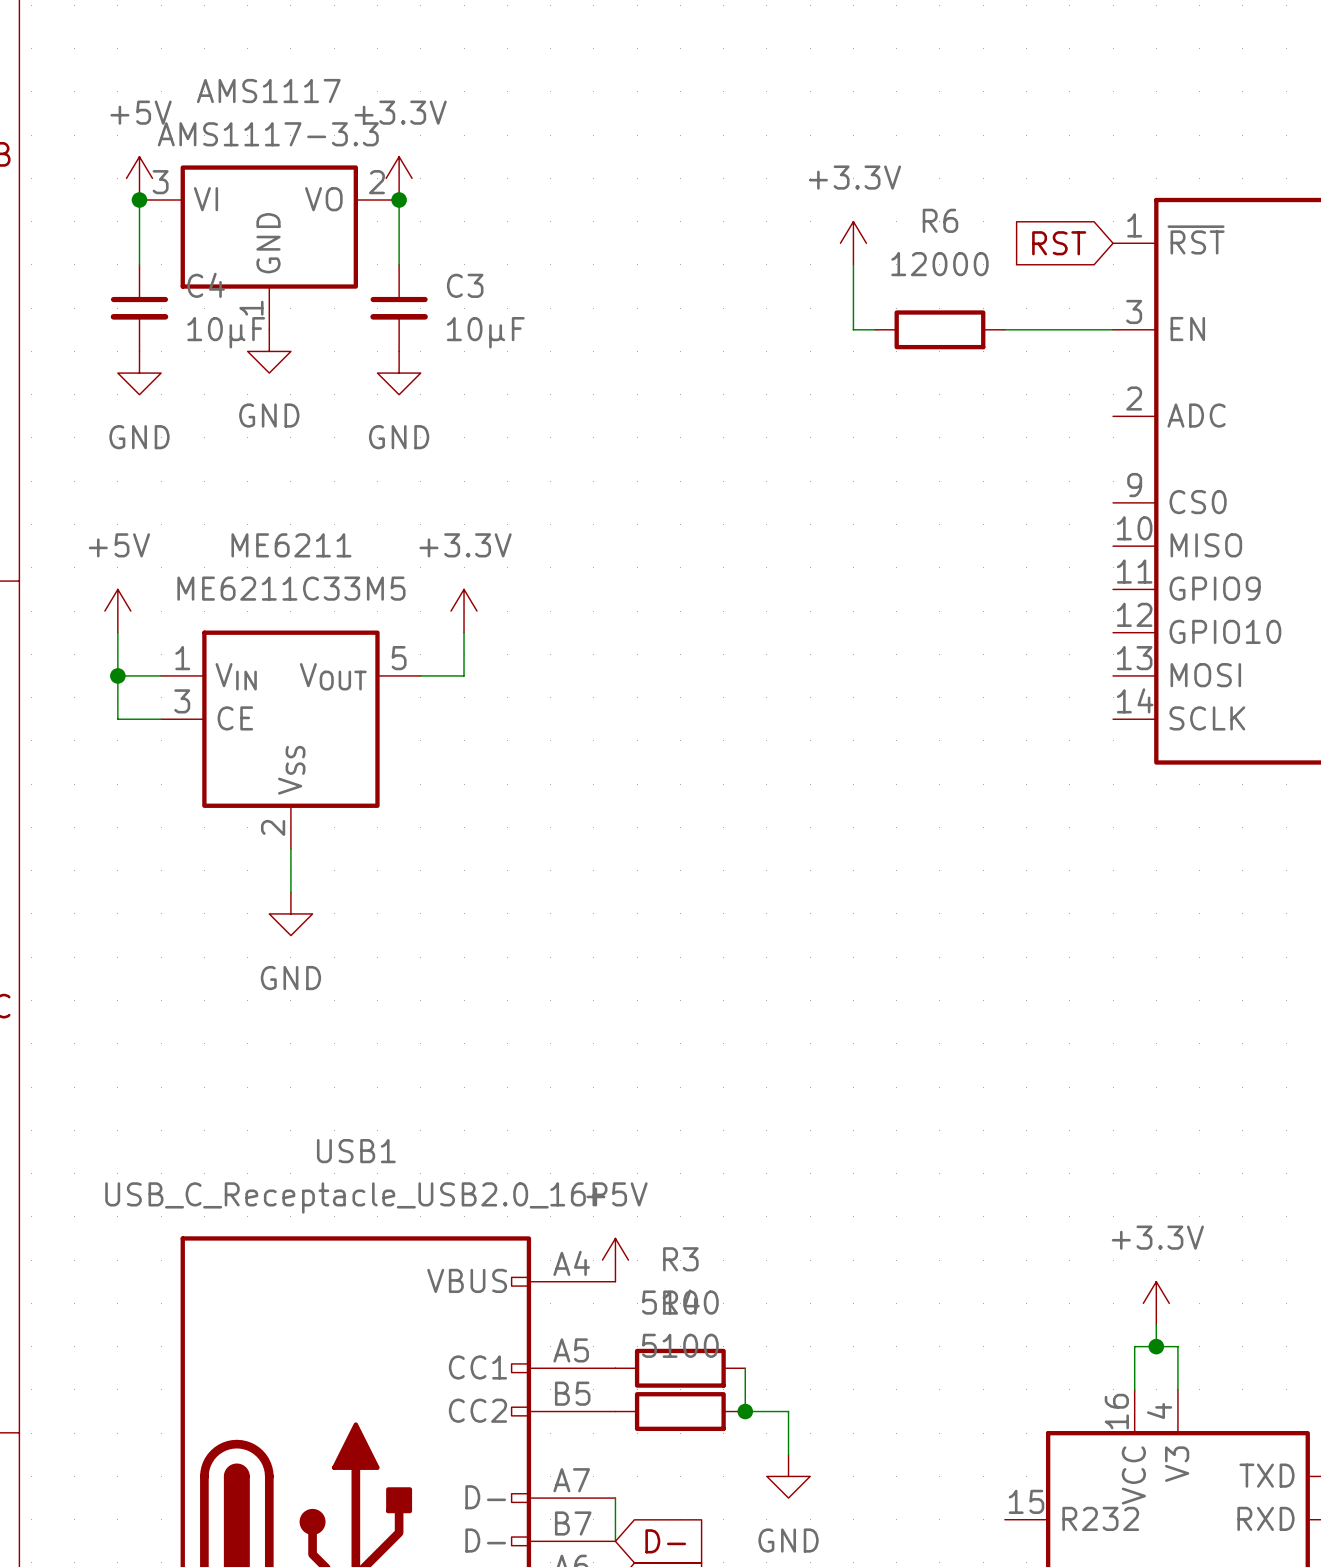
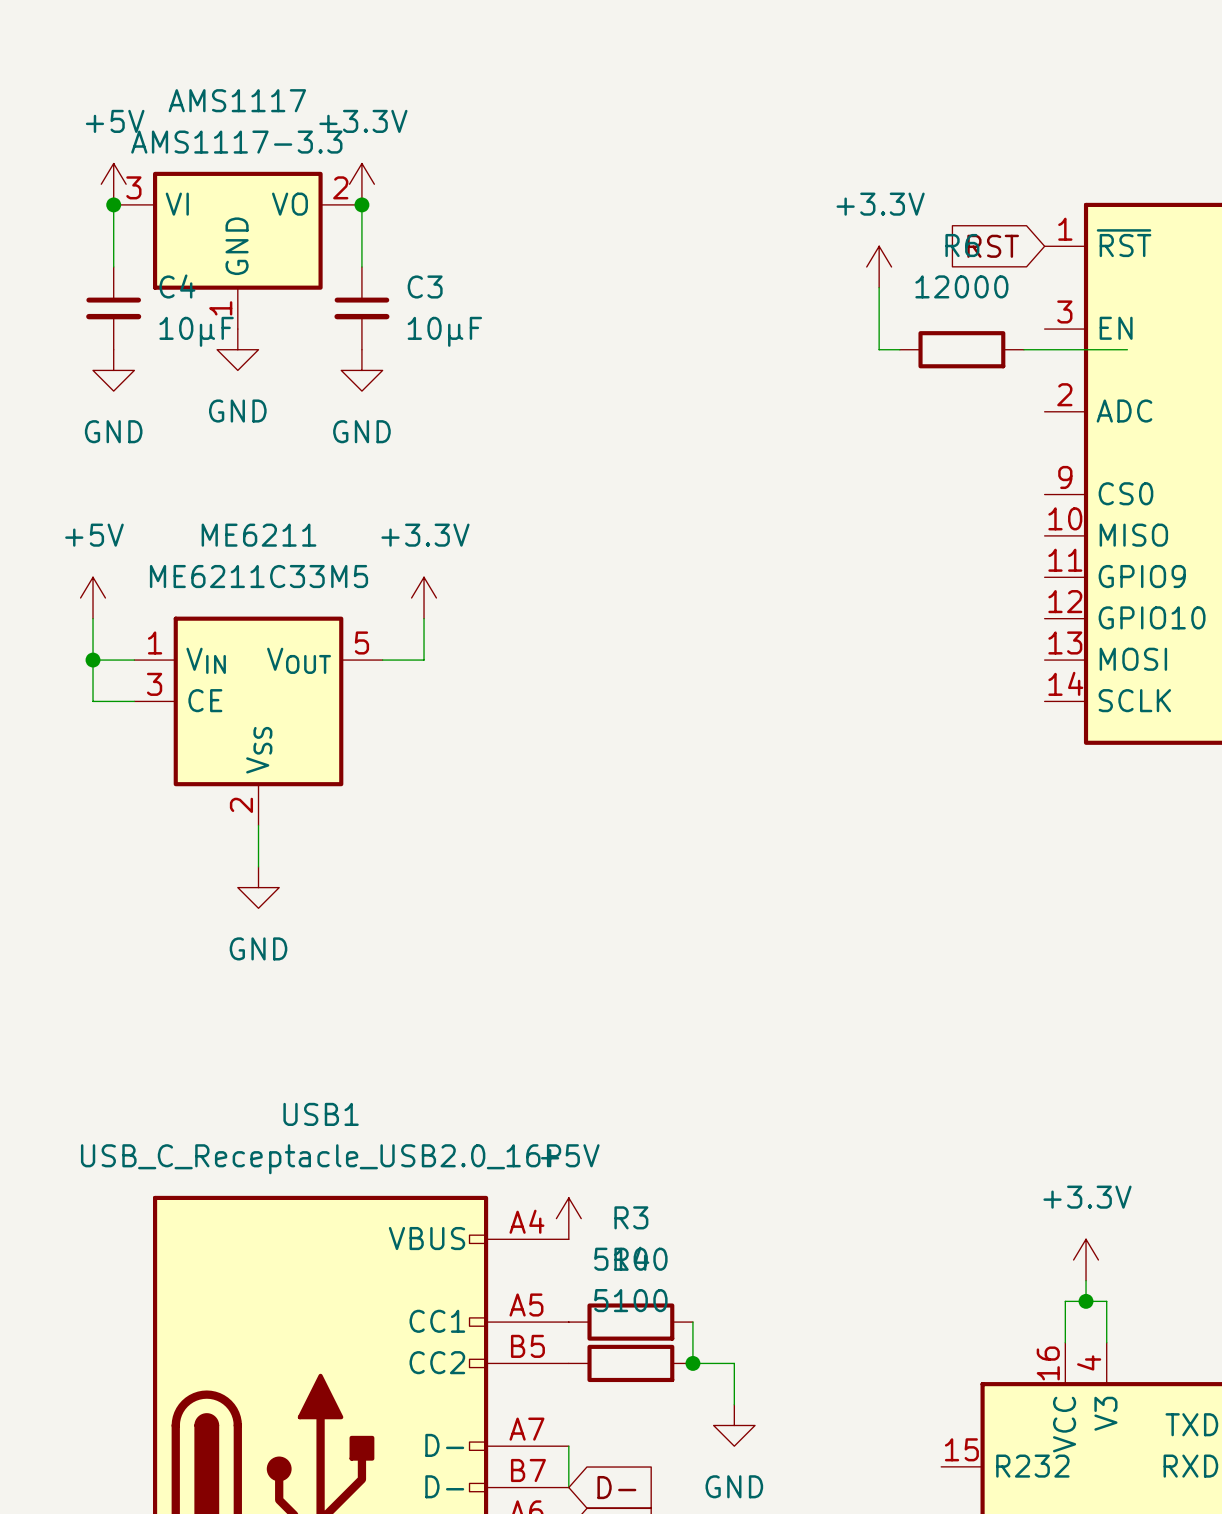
power symbol position: +3.3V (853, 243) -> +3.3V (879, 266)
wire: (853, 264) (853, 329) (875, 329) -> (879, 287) (879, 349) (899, 349)
R6 position: (939, 329) -> (961, 349)
wire: (1004, 329) (1113, 329) -> (1023, 349) (1127, 349)

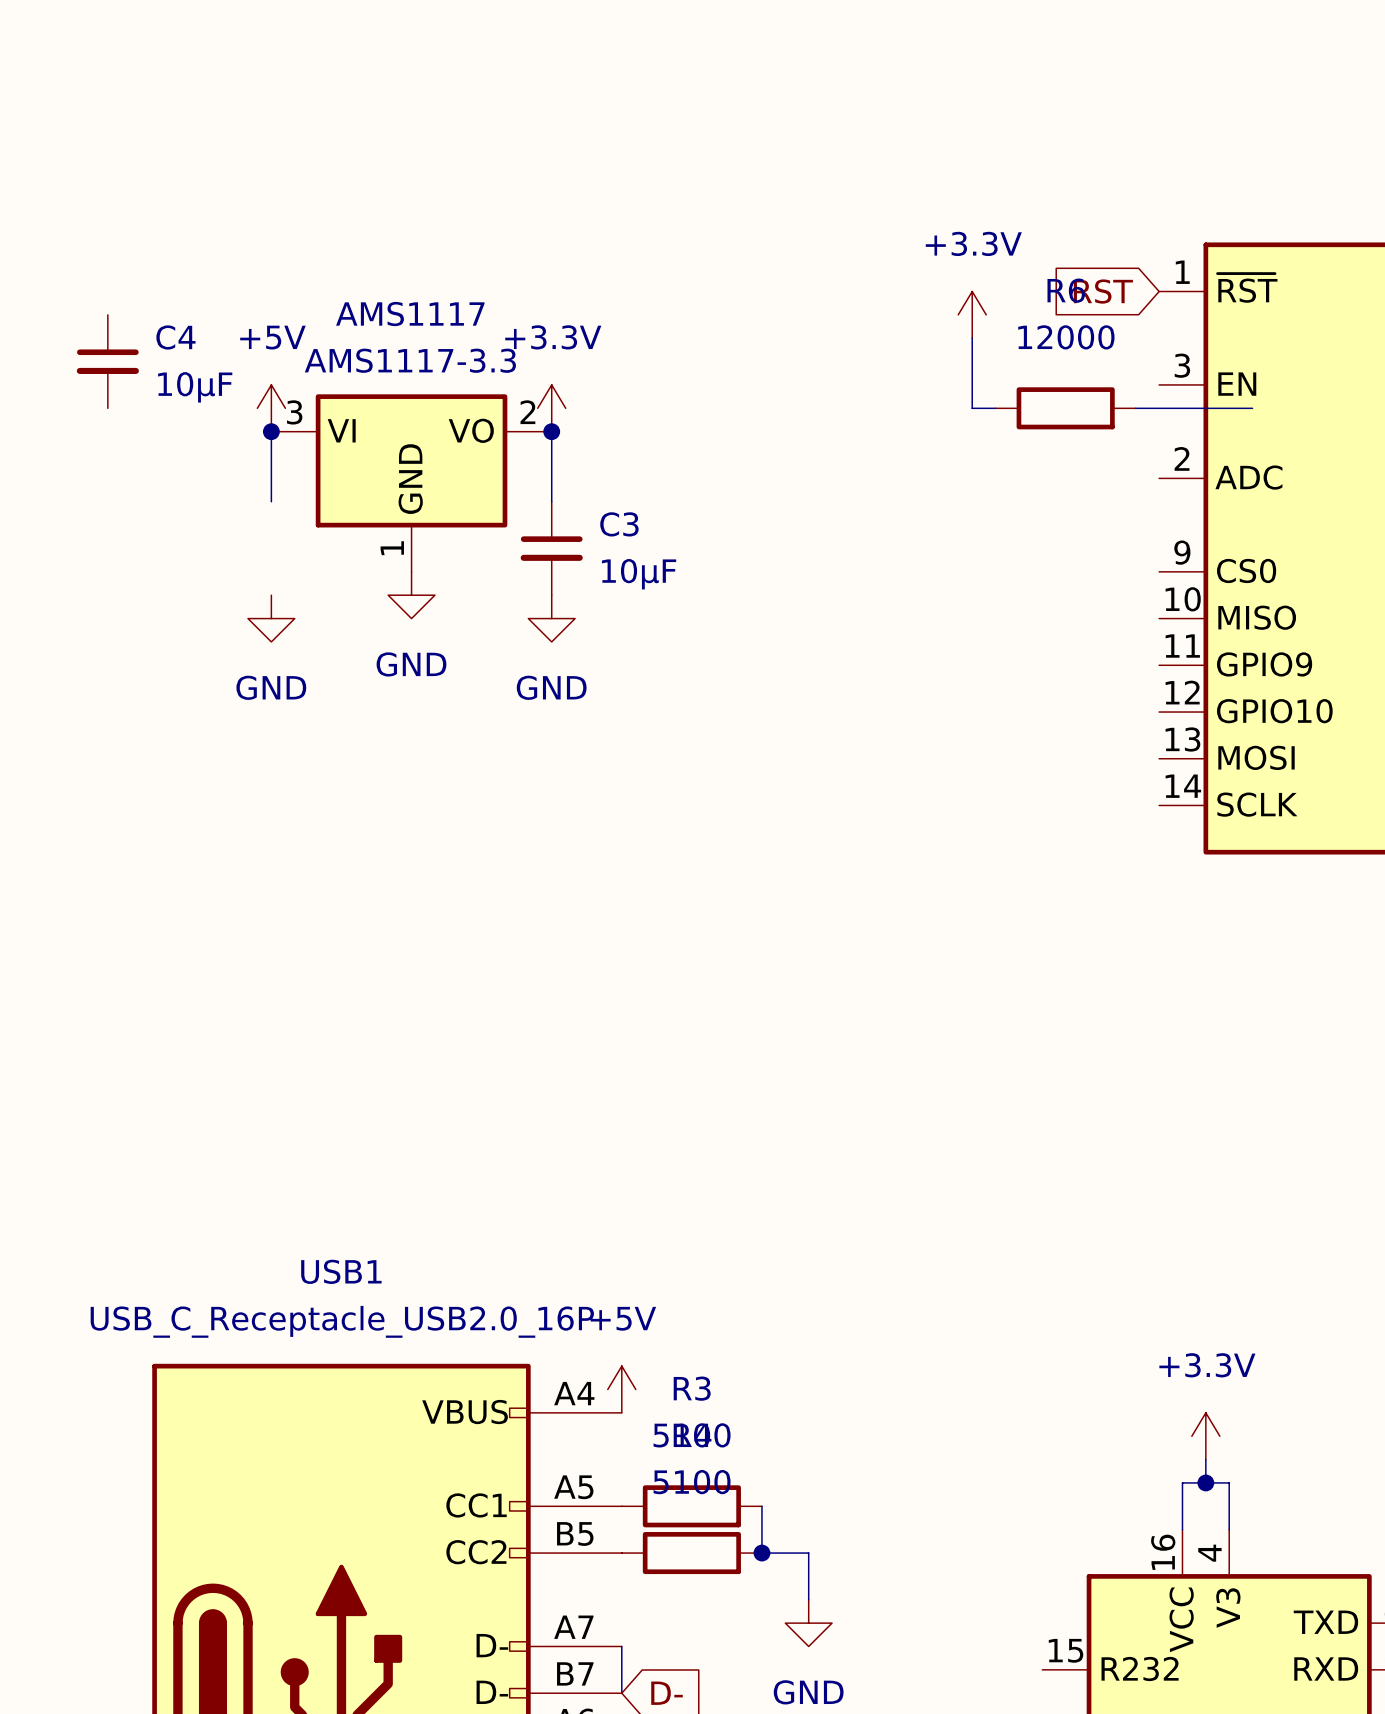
power symbol: +5V (113, 184) -> none
power symbol: +3.3V (361, 184) -> none
wire: (113, 204) (113, 266) -> (271, 431) (271, 501)
junction: (113, 204) -> none
wire: (361, 204) (361, 266) -> (551, 431) (551, 501)
junction: (361, 204) -> none
AMS1117 position: (237, 250) -> (411, 483)
C3 position: (361, 308) -> (551, 548)
power symbol: GND (237, 349) -> none
power symbol: none -> +5V (271, 408)
power symbol: none -> +3.3V (551, 408)
power symbol: GND (113, 370) -> none
junction: none -> (271, 431)
power symbol: GND (361, 370) -> none
junction: none -> (551, 431)
power symbol: none -> GND (411, 595)
power symbol: none -> GND (271, 618)
power symbol: none -> GND (551, 618)
power symbol: +5V (93, 597) -> none
power symbol: +3.3V (424, 597) -> none
wire: (93, 618) (93, 701) (134, 701) -> none
wire: (424, 618) (424, 660) (382, 660) -> none
wire: (93, 660) (134, 660) -> none
junction: (93, 660) -> none
ME6211: ME6211C33M5 (258, 721) -> none
wire: (258, 825) (258, 866) -> none
power symbol: GND (258, 887) -> none

